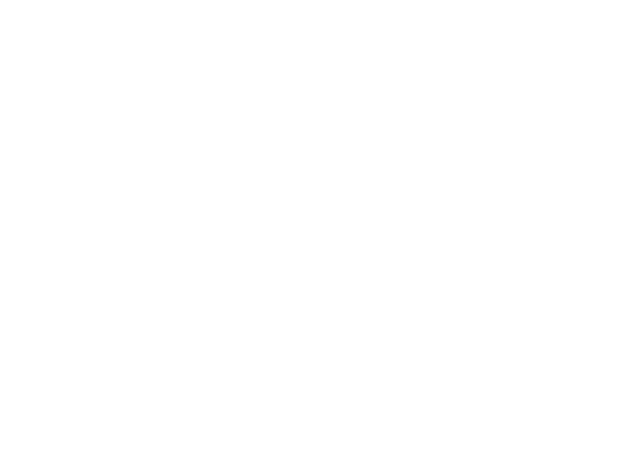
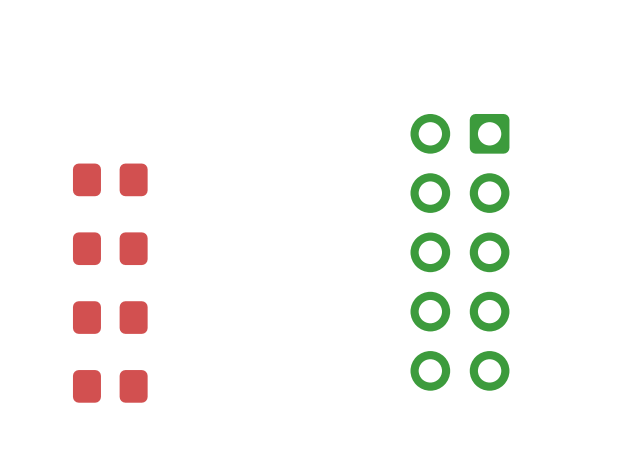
part: none -> (110, 179)
part: none -> (110, 248)
part: none -> (459, 252)
part: none -> (110, 317)
part: none -> (110, 386)

